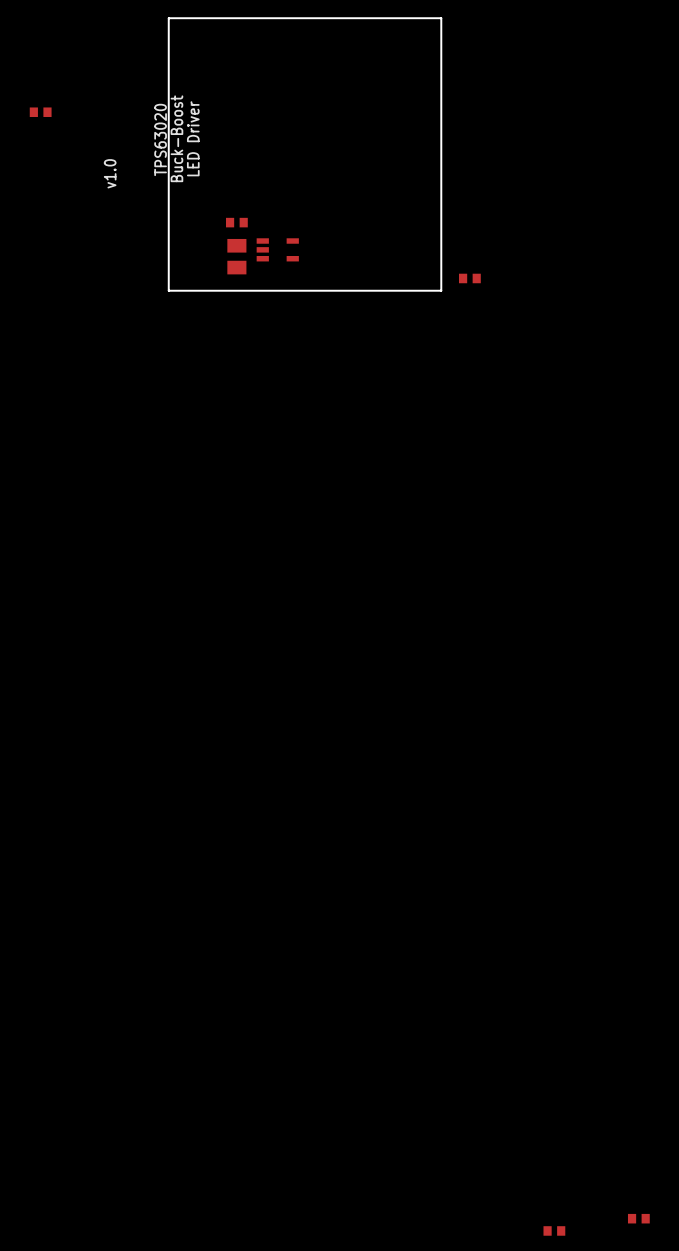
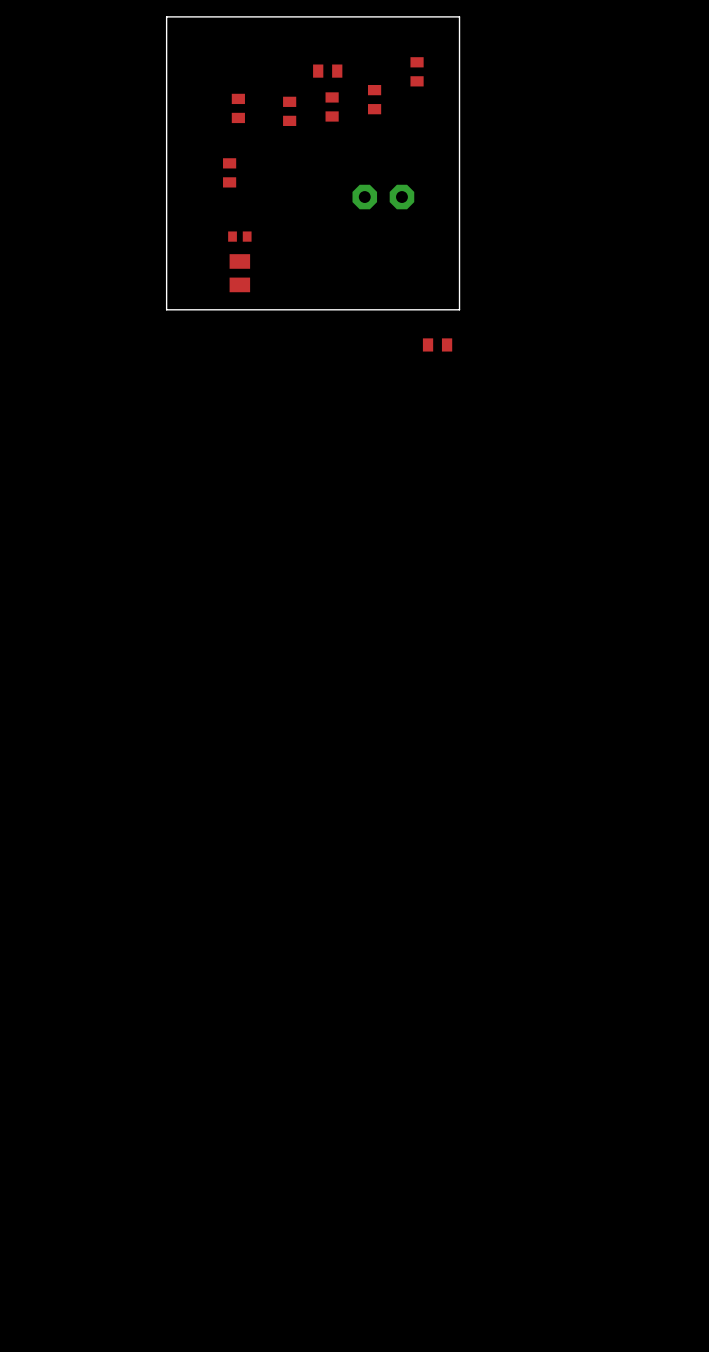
part: none -> (327, 71)
part: none -> (417, 71)
part: none -> (374, 99)
part: none -> (332, 106)
part: none -> (238, 108)
part: none -> (289, 111)
part: (40, 112) -> none
text: Buck-Boost (176, 138) -> none
text: LED Driver (193, 138) -> none
text: TPS63020 (160, 139) -> none
part: none -> (229, 172)
text: v1.0 (110, 173) -> none
part: none -> (383, 197)
part: (277, 249) -> none
part: (469, 278) -> none
part: none -> (437, 344)
part: (638, 1218) -> none
part: (554, 1230) -> none

